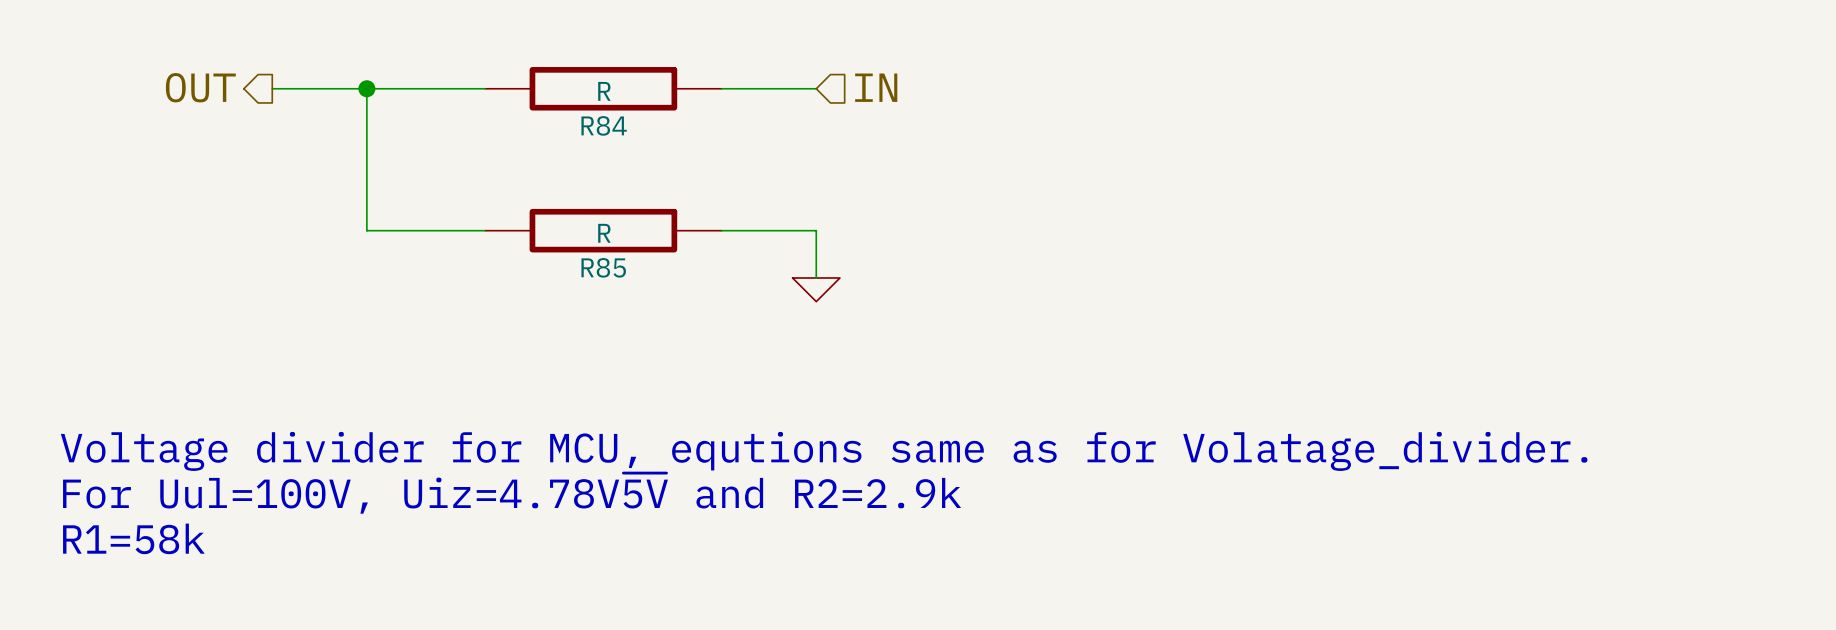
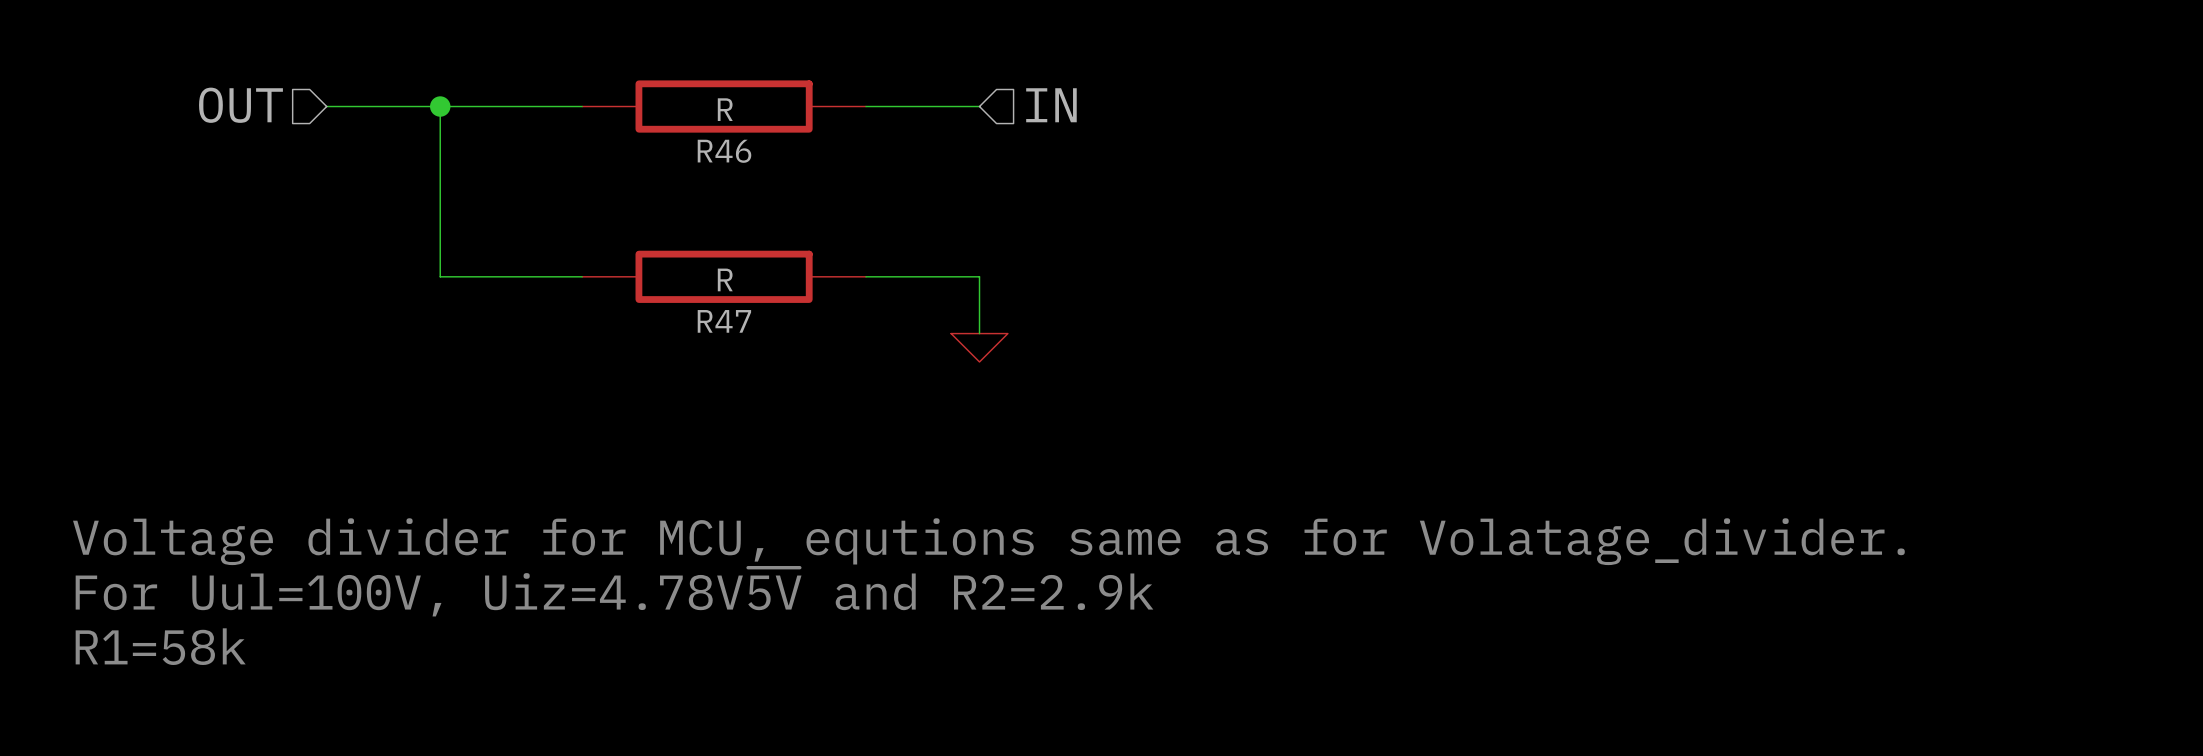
hierarchical label shape: output (200, 87) -> input (240, 105)
R84 name: R84 (604, 125) -> R46 (724, 151)
R85 name: R85 (603, 267) -> R47 (724, 321)

